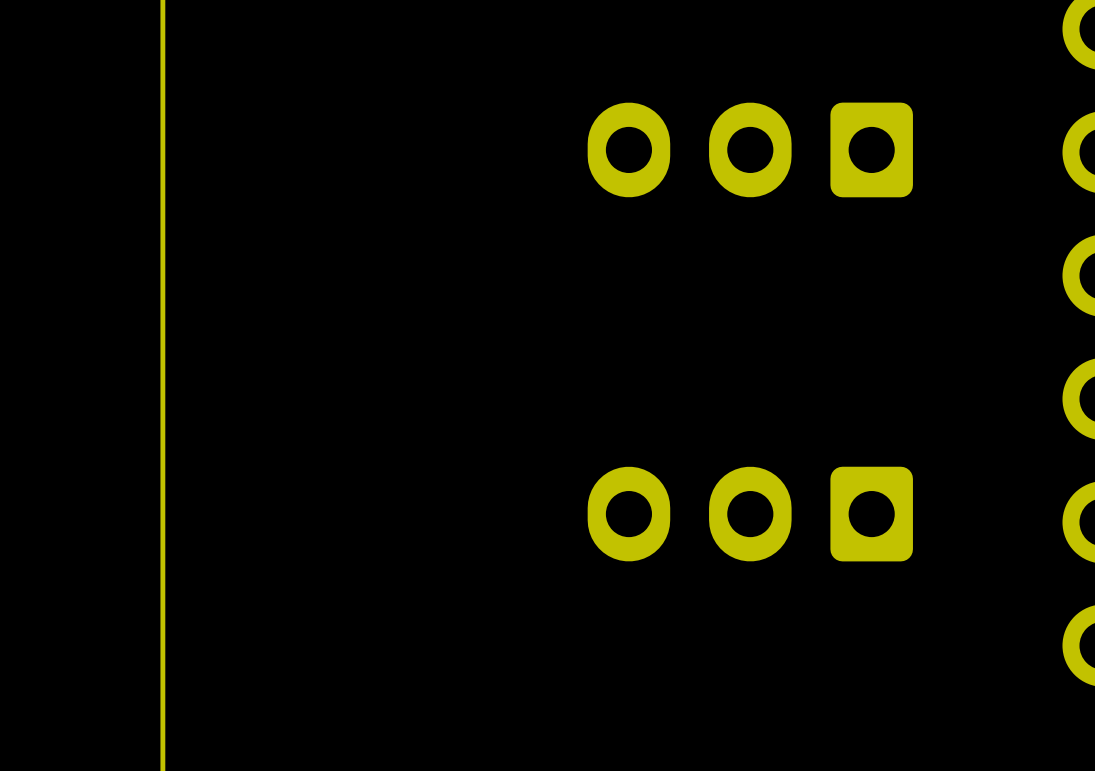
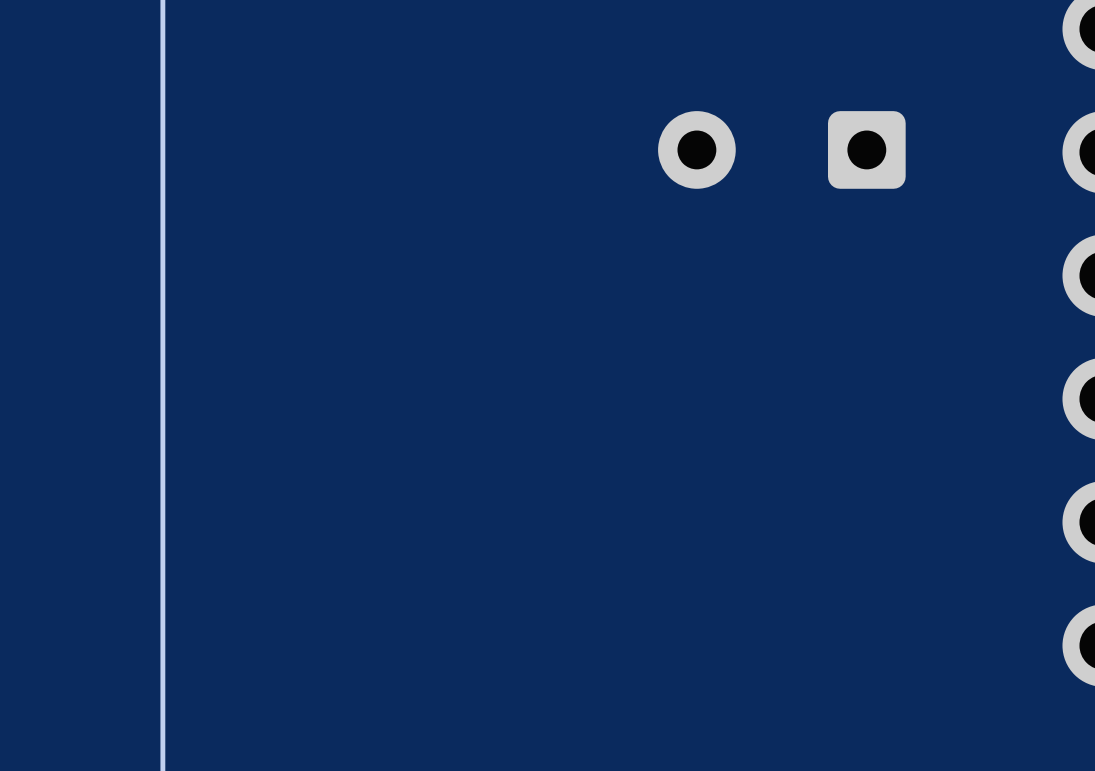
part footprint: [587, 102, 913, 198] -> [658, 111, 906, 189]
part: (750, 514) -> none

